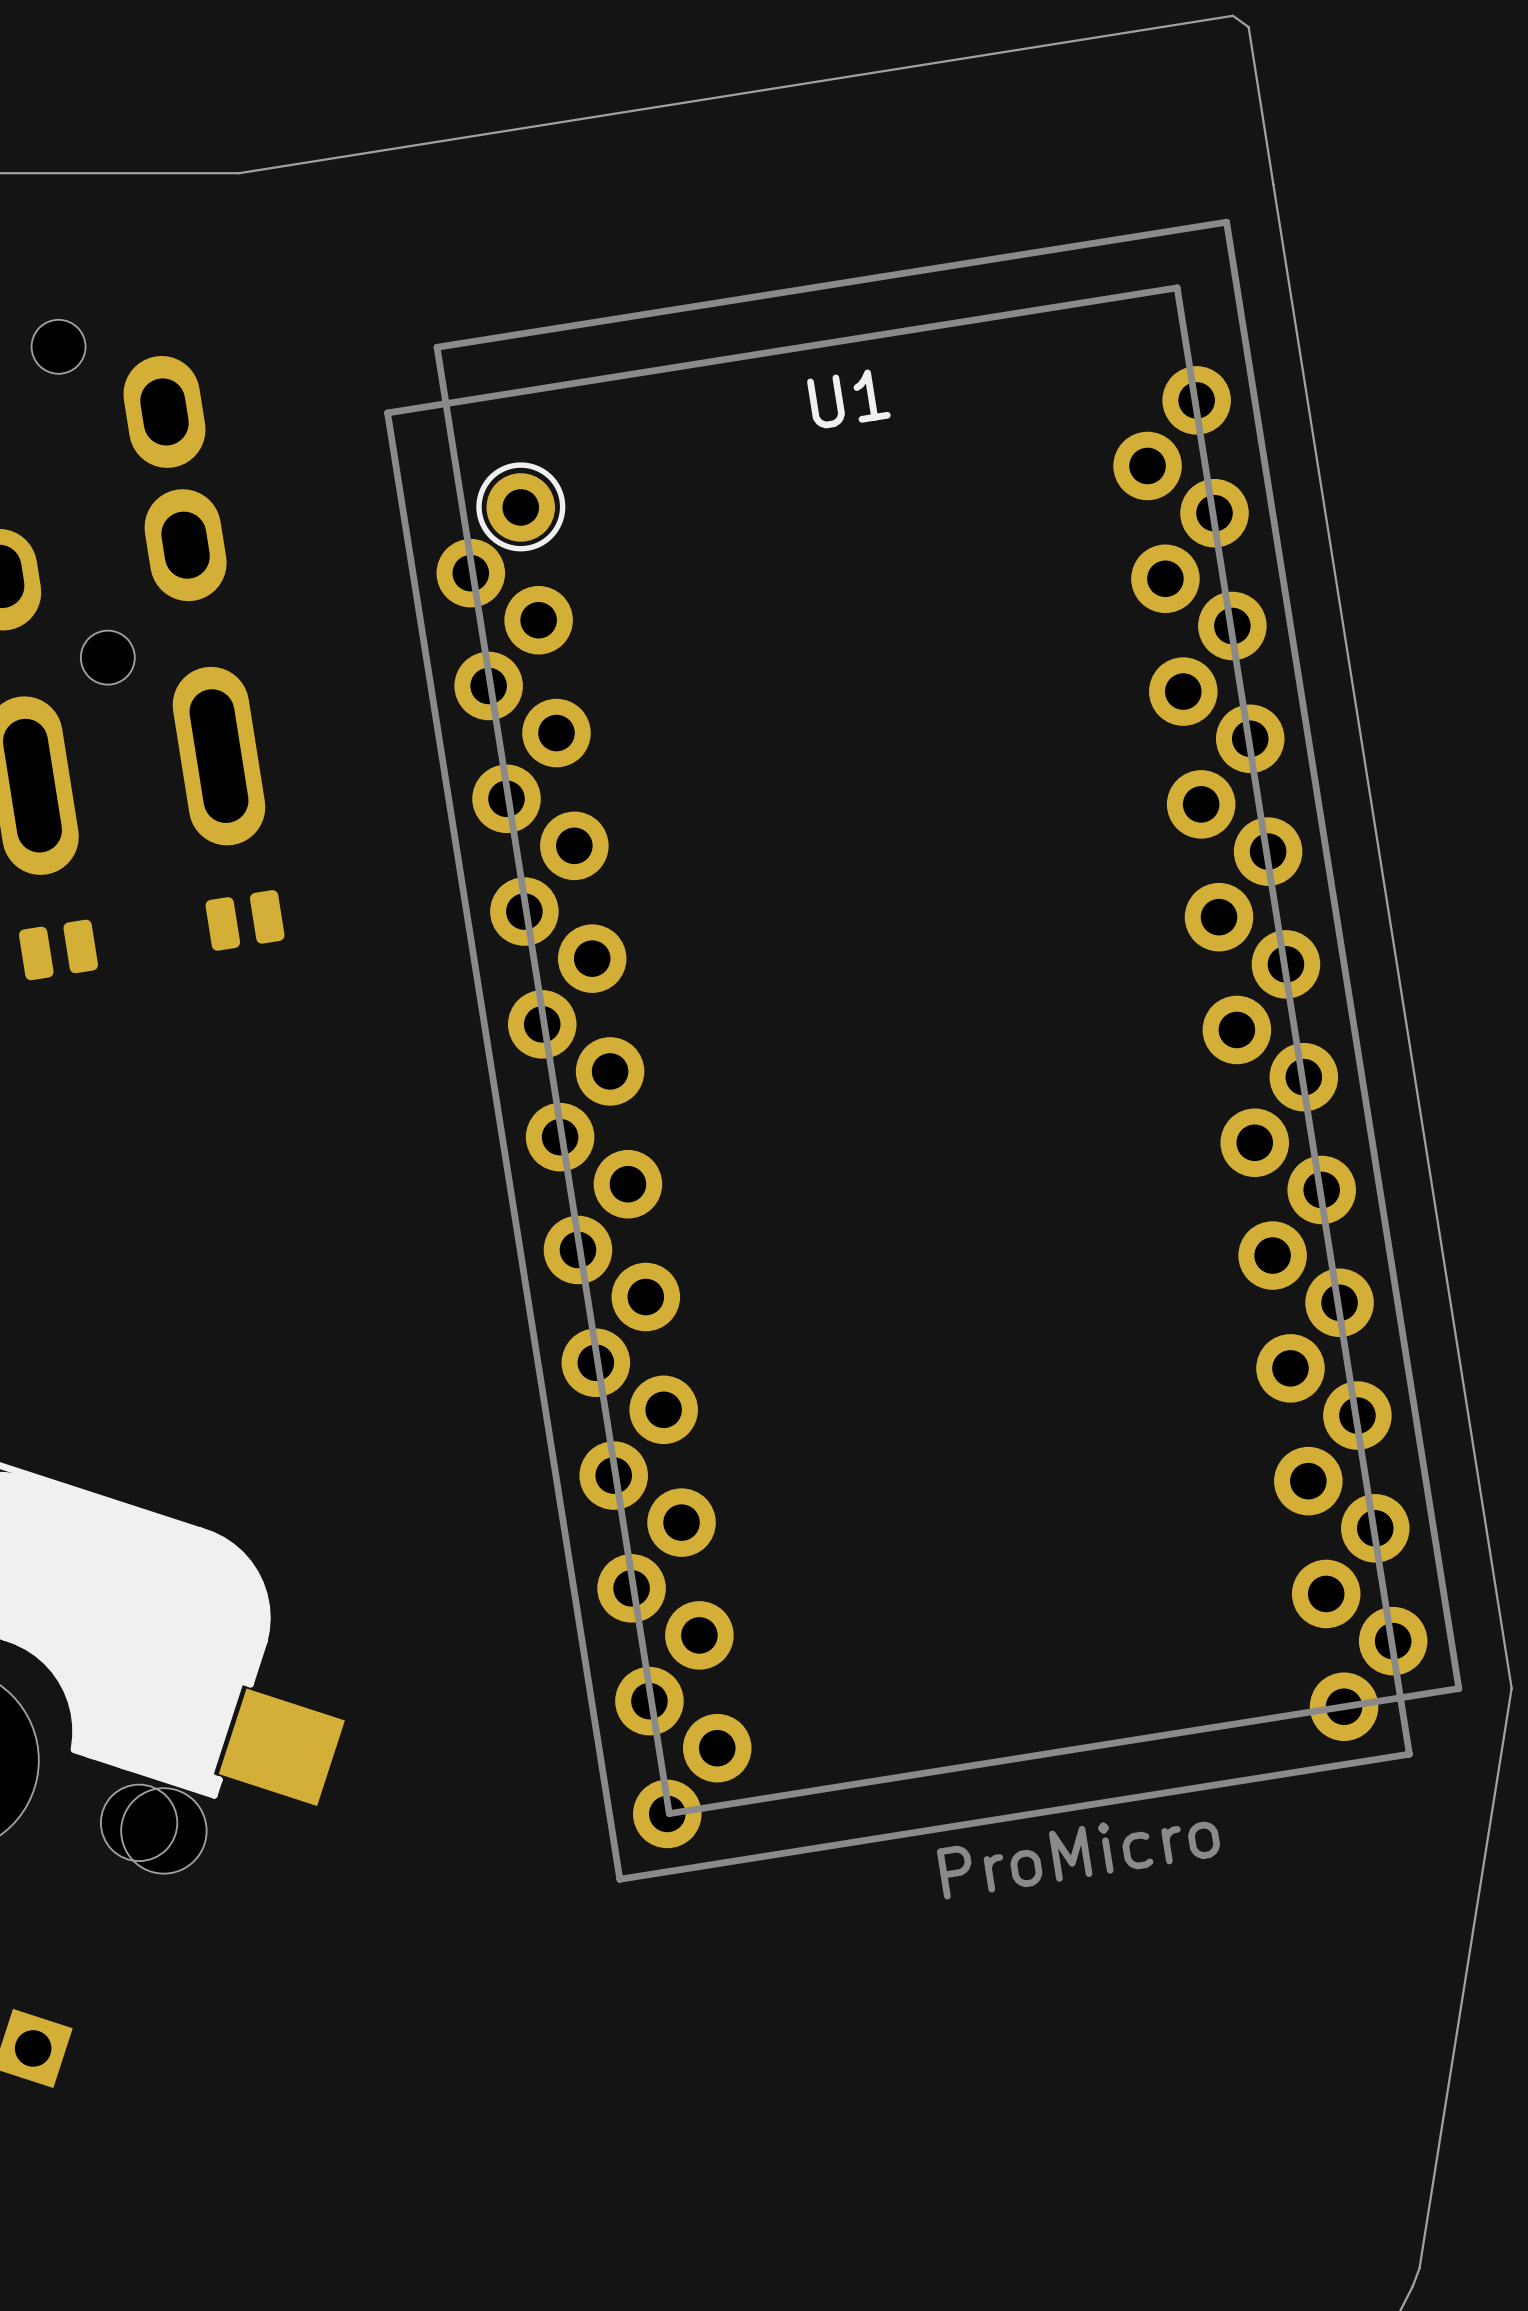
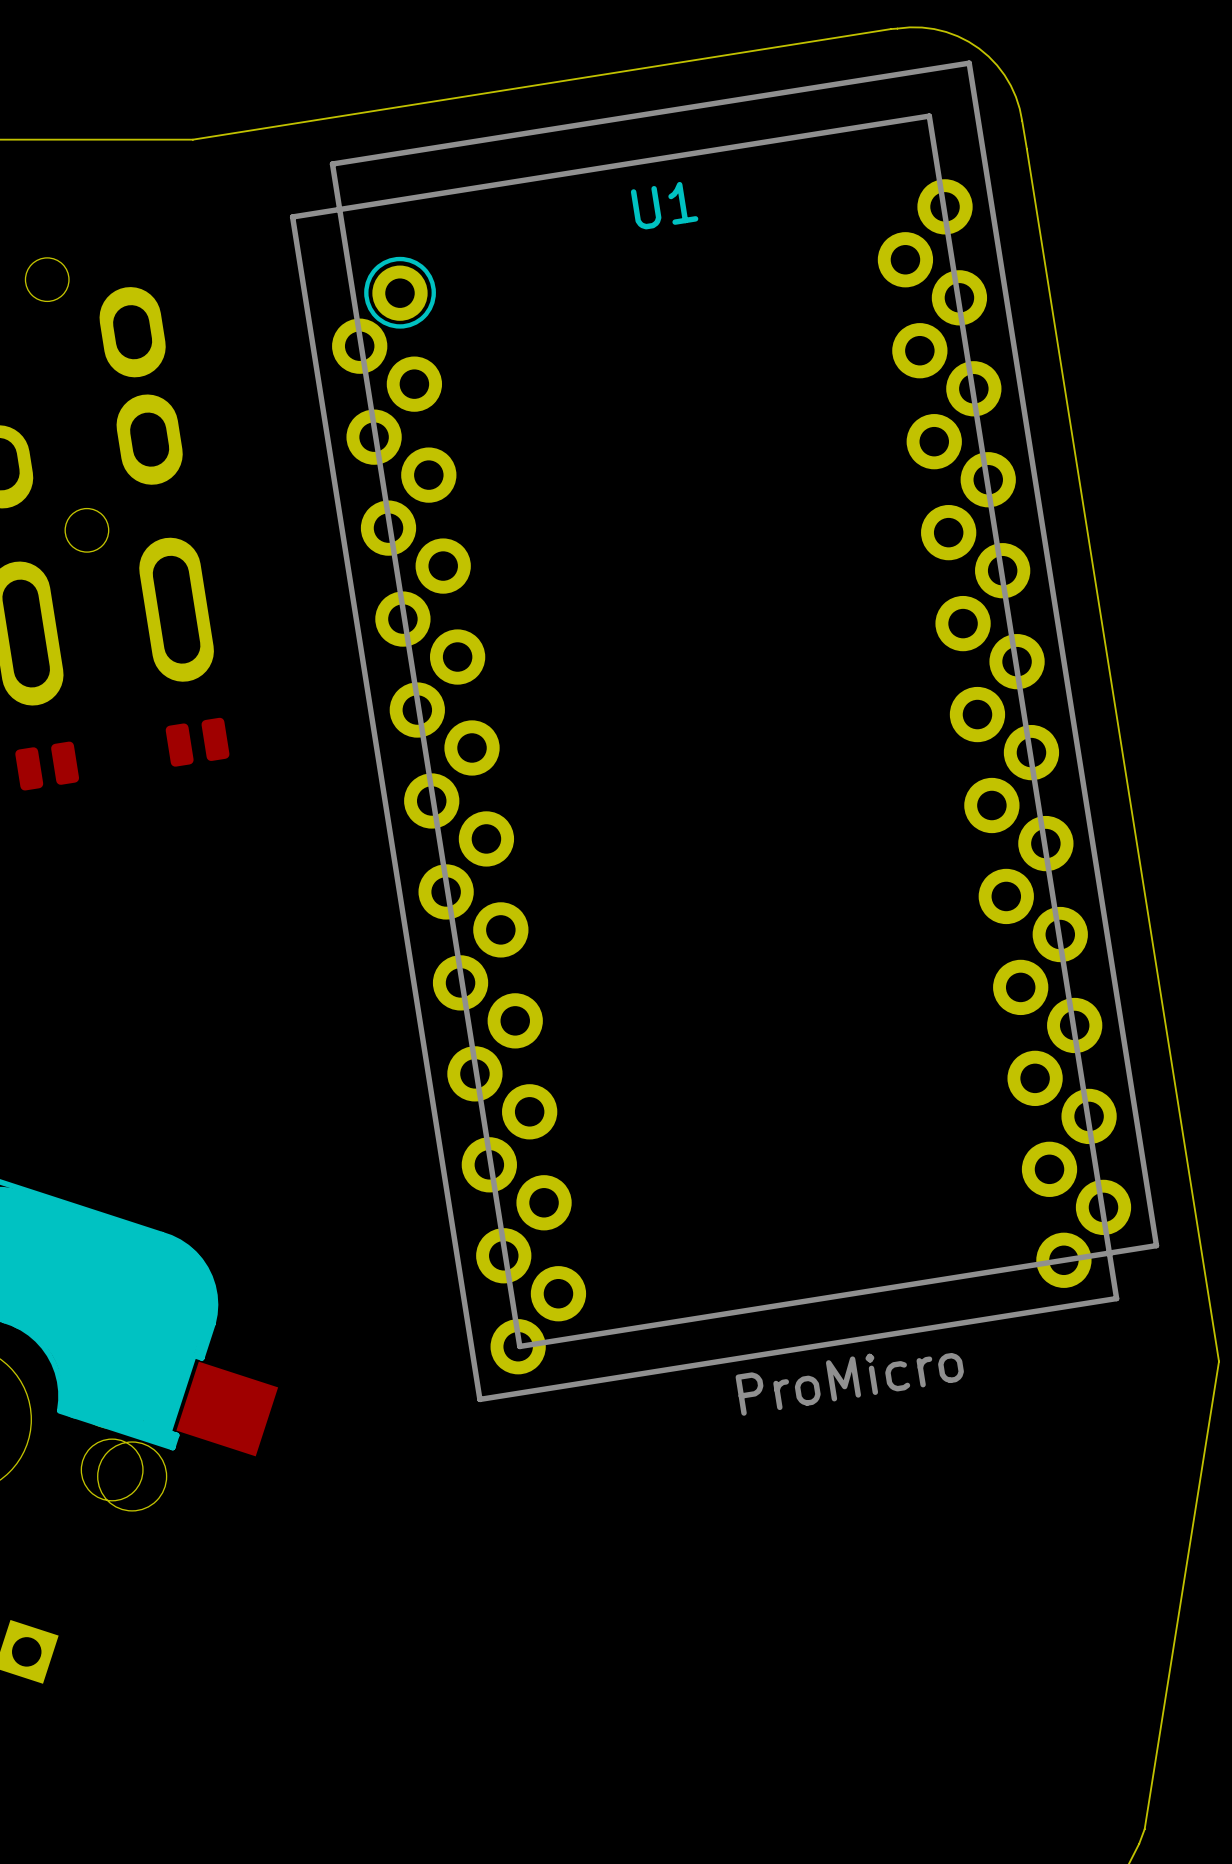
board edge: (239, 173) (1232, 15) (1248, 27) (1273, 184) -> (192, 139) (909, 27) (934, 29) (957, 36) (988, 56) (1004, 75) (1015, 96) (1026, 148)
U1 position: (923, 1050) -> (724, 731)

